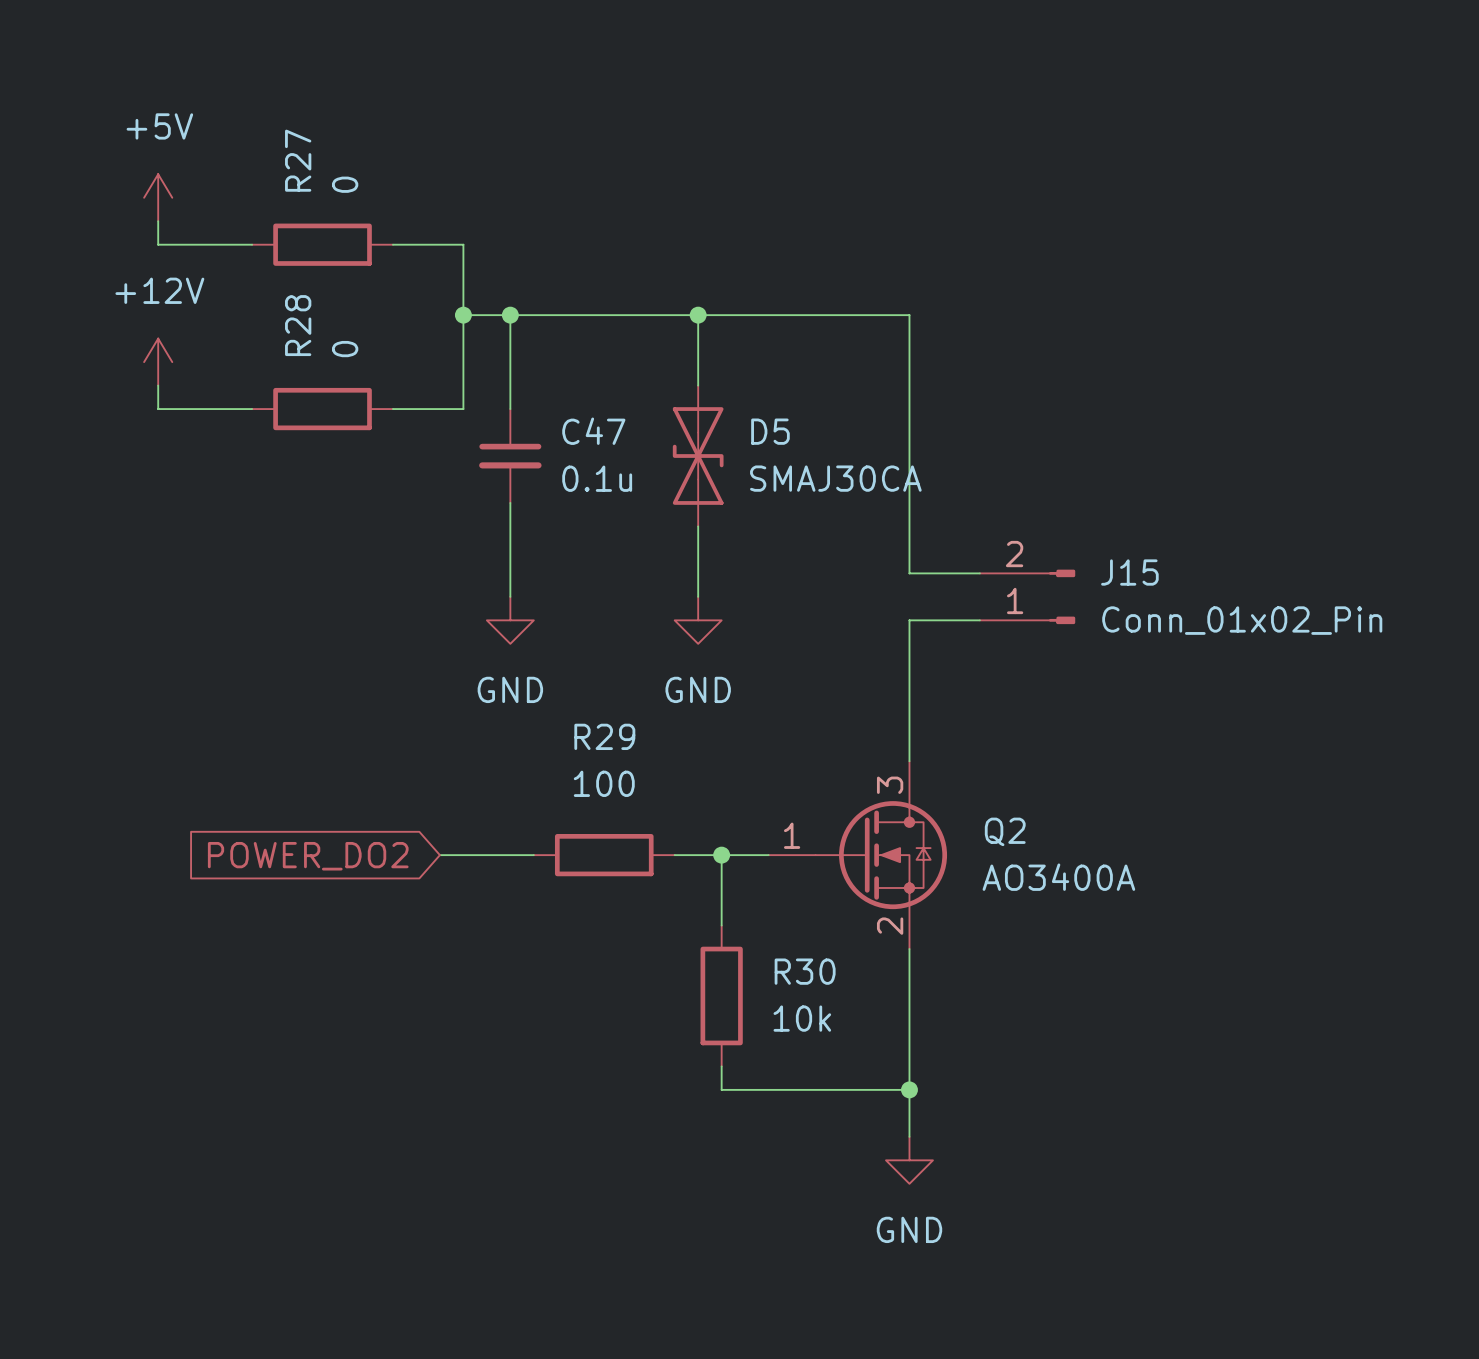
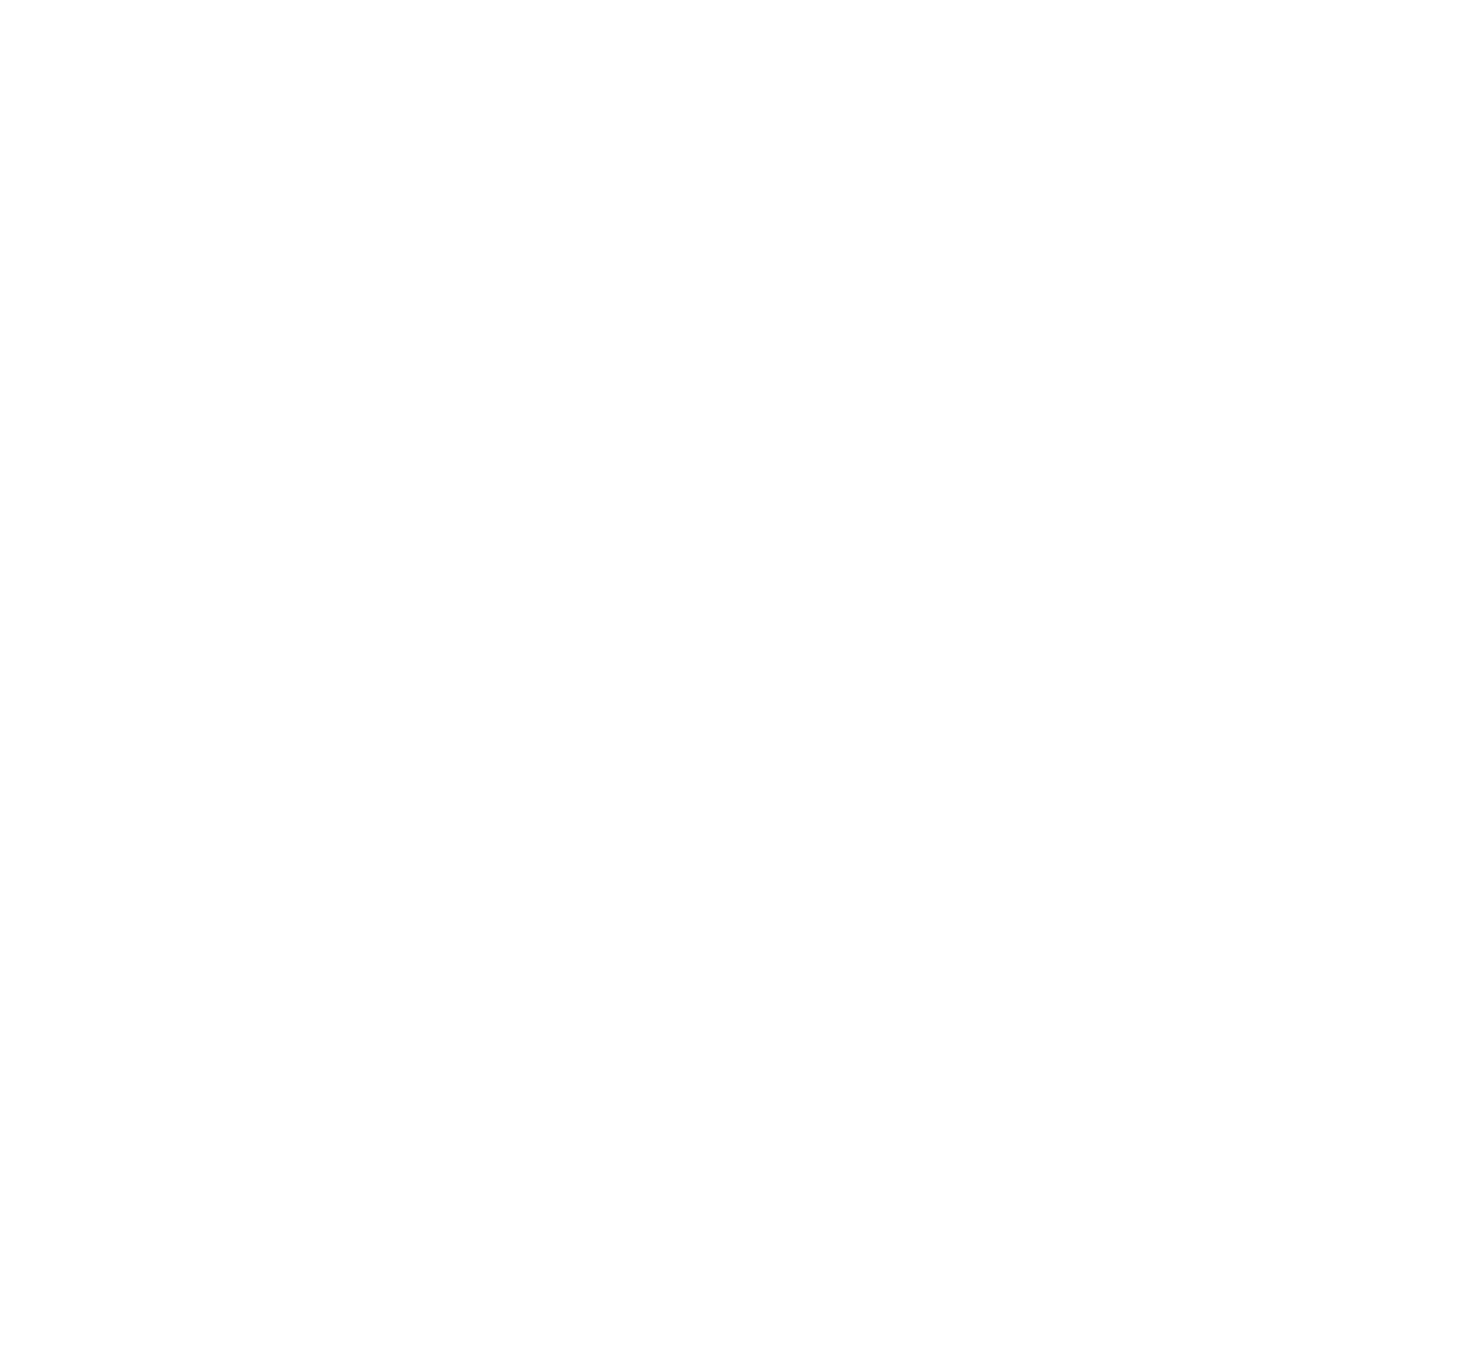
power symbol: +5V (158, 197) -> none
wire: (158, 221) (158, 244) (252, 244) -> none
R27: 0 (322, 244) -> none
wire: (392, 244) (463, 244) (463, 409) (392, 409) -> none
wire: (463, 315) (909, 315) (909, 573) (979, 573) -> none
junction: (463, 315) -> none
wire: (510, 315) (510, 409) -> none
junction: (510, 315) -> none
wire: (698, 315) (698, 385) -> none
junction: (698, 315) -> none
power symbol: +12V (158, 362) -> none
wire: (158, 385) (158, 409) (252, 409) -> none
R28: 0 (322, 409) -> none
C47: 0.1u (510, 456) -> none
D5: SMAJ30CA (698, 456) -> none
wire: (510, 502) (510, 596) -> none
wire: (698, 526) (698, 596) -> none
J15: Conn_01x02_Pin (1027, 596) -> none
power symbol: GND (510, 620) -> none
power symbol: GND (698, 620) -> none
wire: (979, 620) (909, 620) (909, 761) -> none
wire: (439, 855) (533, 855) -> none
R29: 100 (604, 855) -> none
wire: (674, 855) (768, 855) -> none
wire: (721, 855) (721, 925) -> none
junction: (721, 855) -> none
Q2: AO3400A (857, 855) -> none
global label: POWER_DO2 (308, 856) -> none
wire: (909, 949) (909, 1136) -> none
R30: 10k (721, 995) -> none
wire: (721, 1066) (721, 1089) (909, 1089) -> none
junction: (909, 1089) -> none
power symbol: GND (909, 1160) -> none

